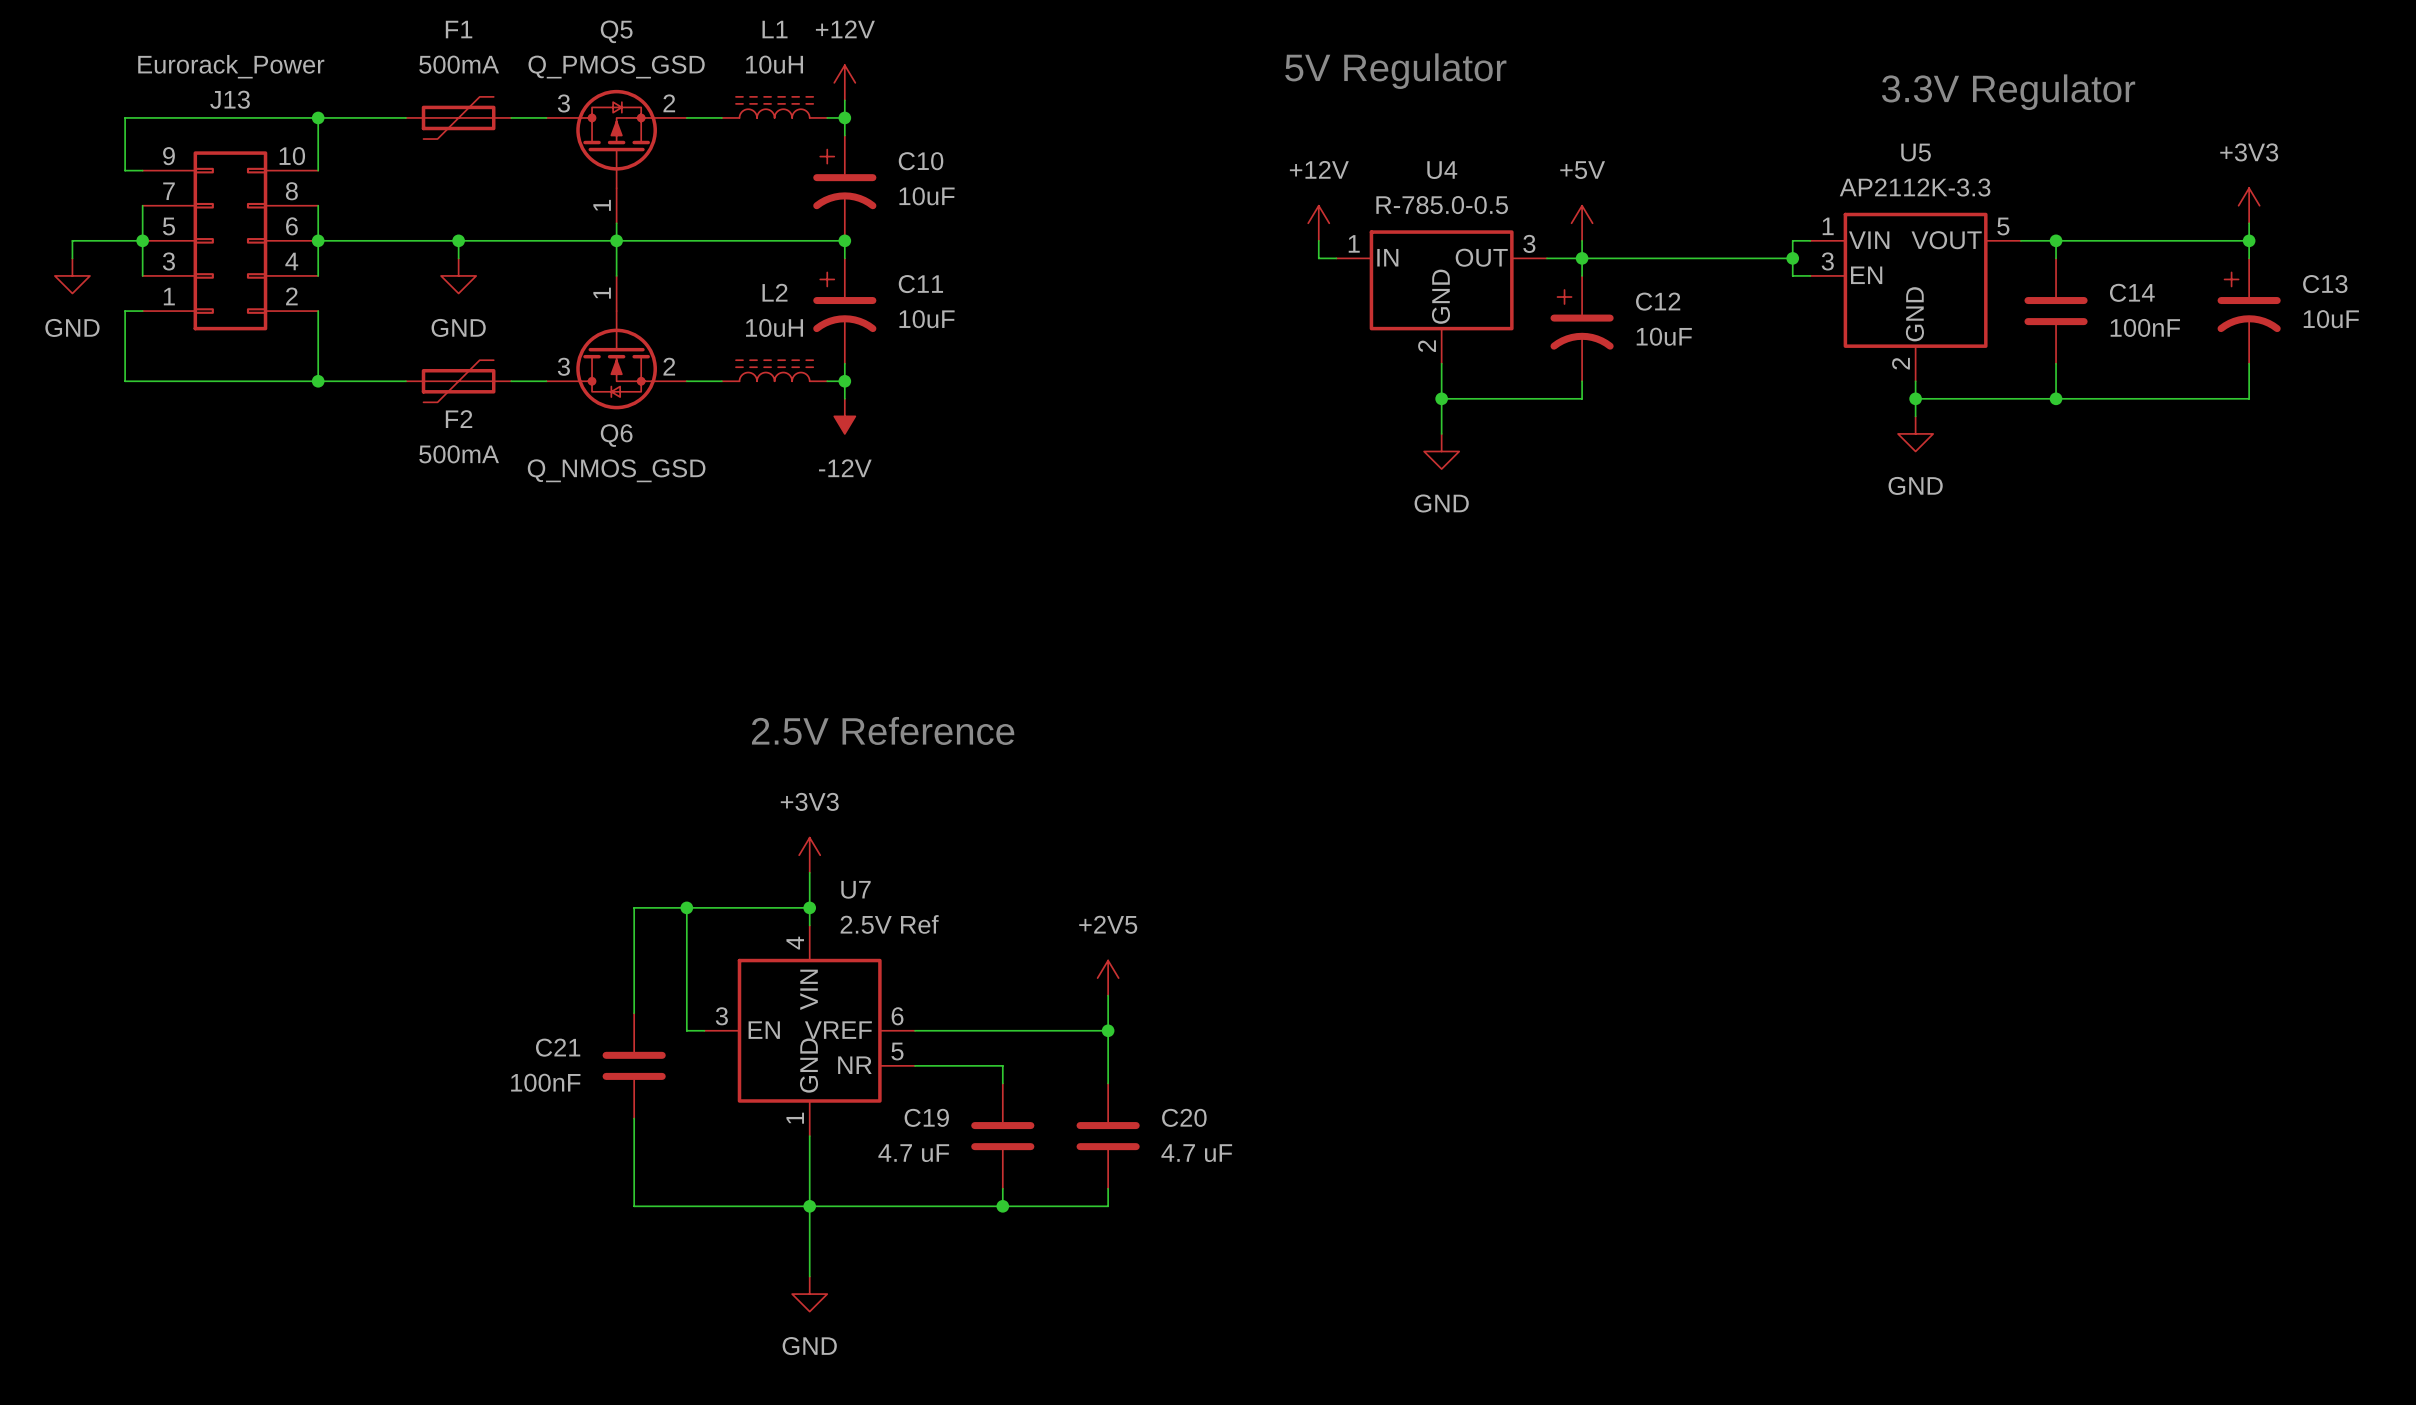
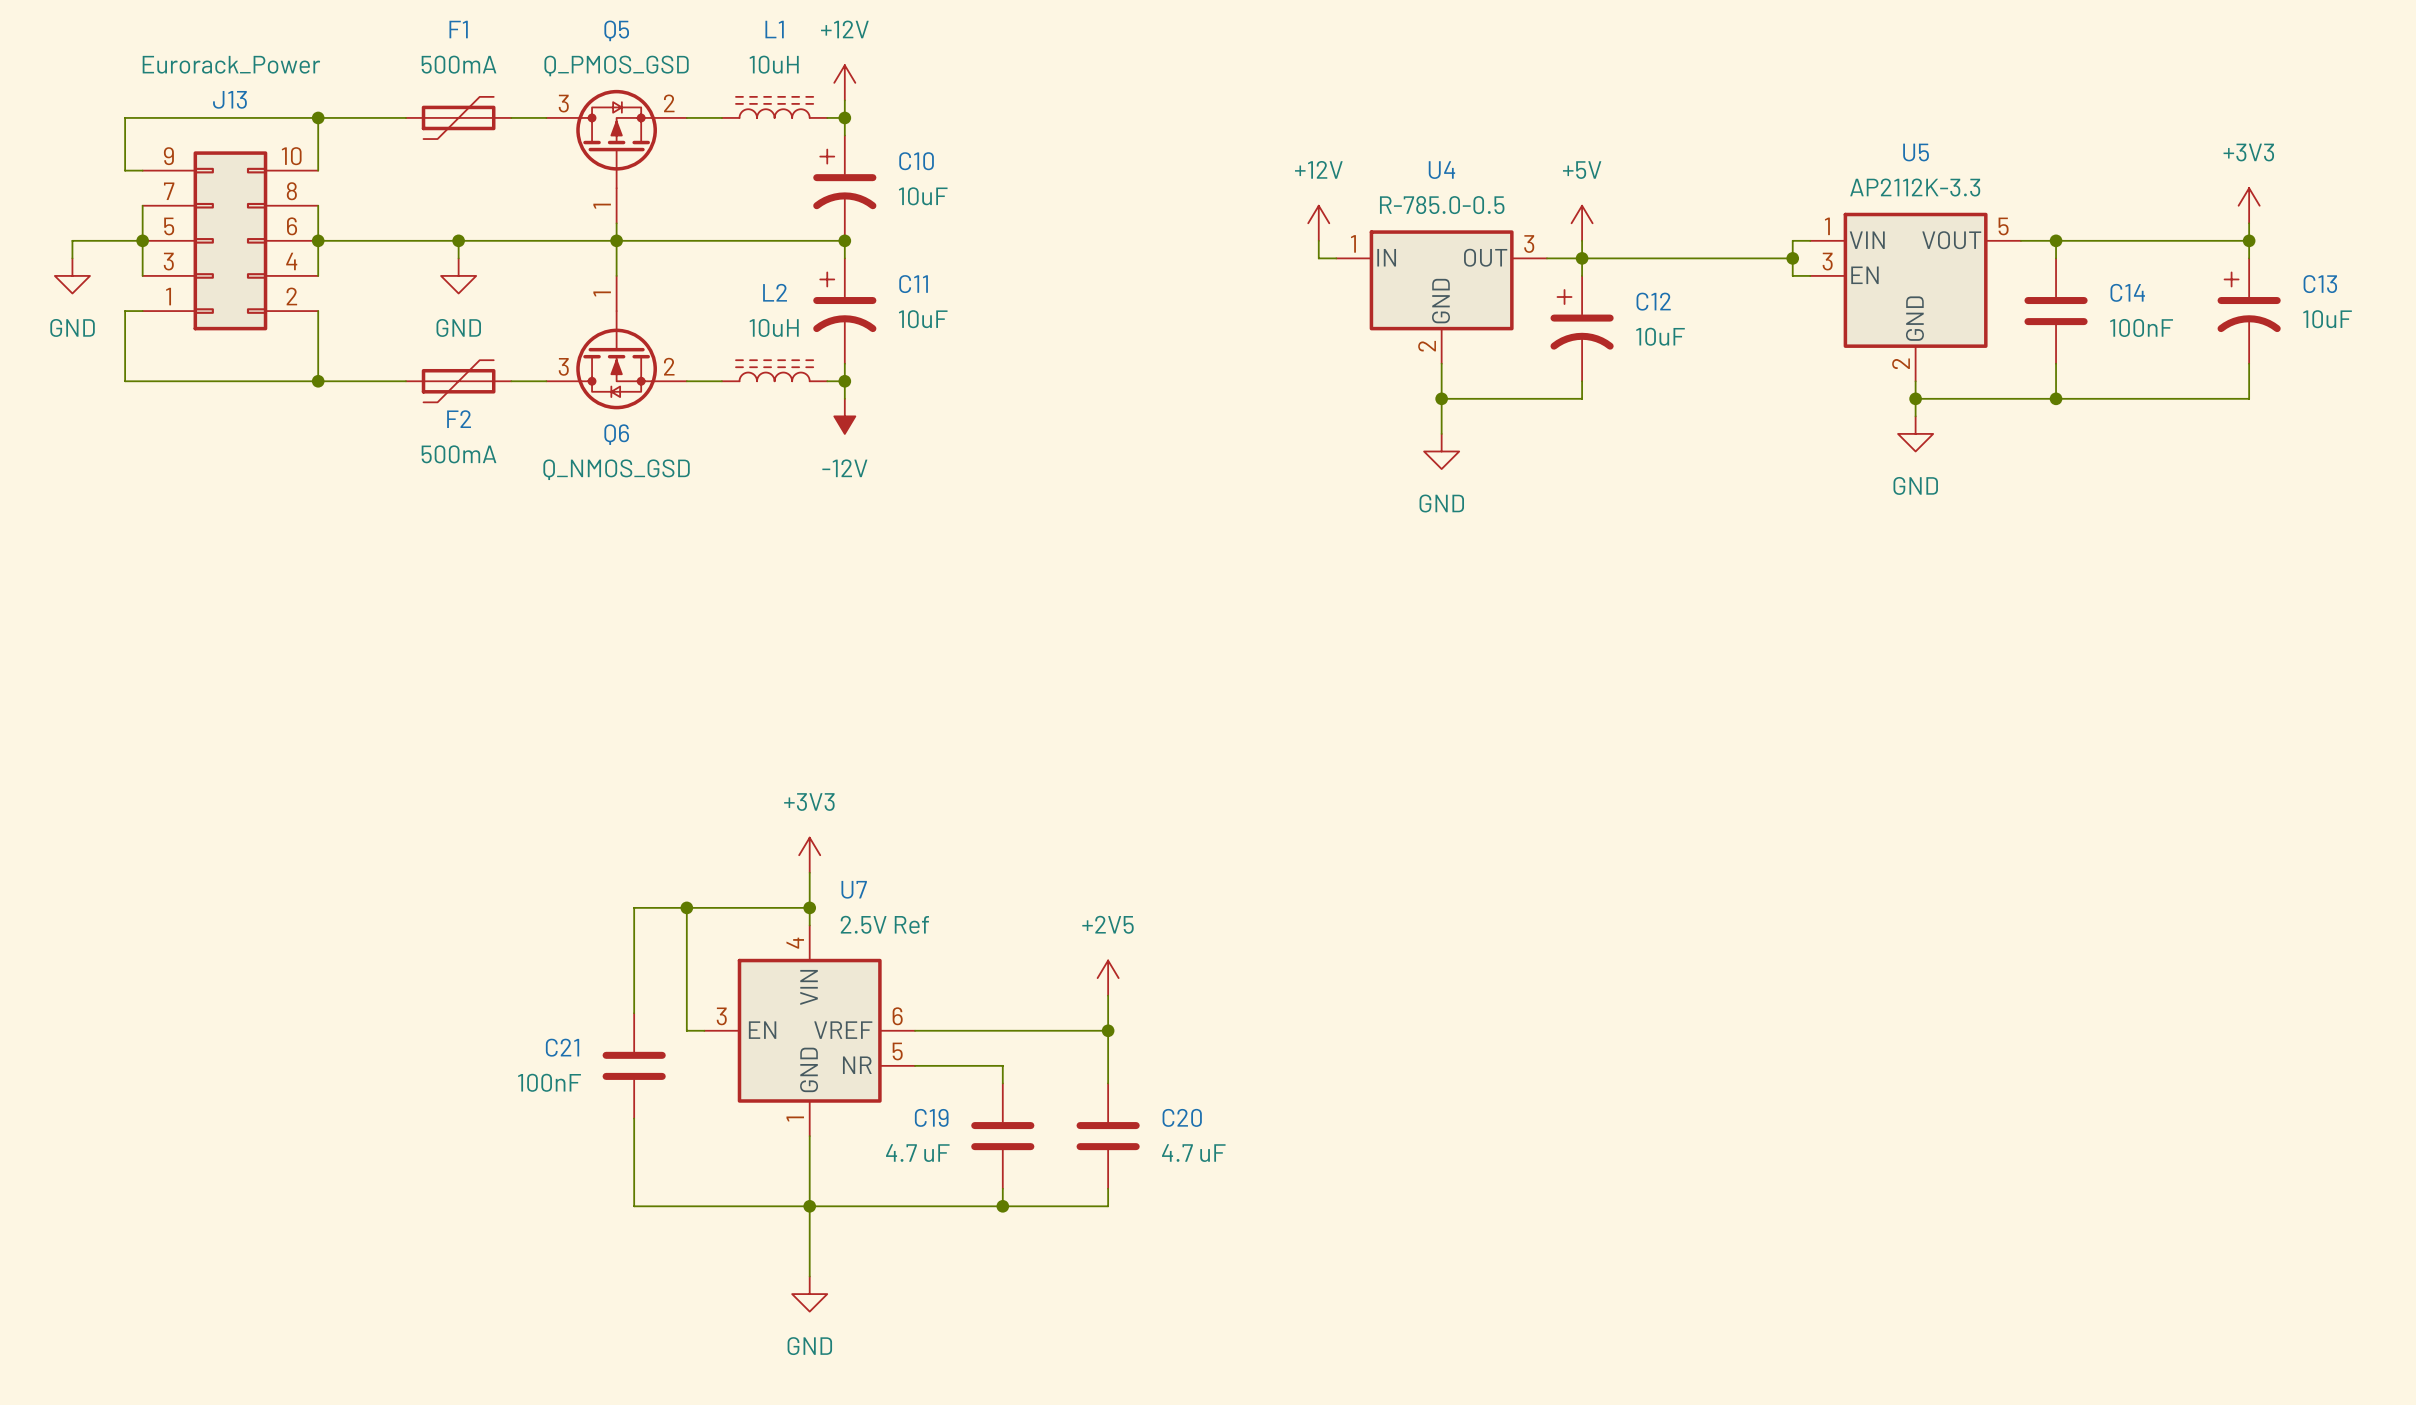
text: 5V Regulator (1395, 71) -> none
text: 3.3V Regulator (2008, 92) -> none
text: 2.5V Reference (883, 730) -> none

